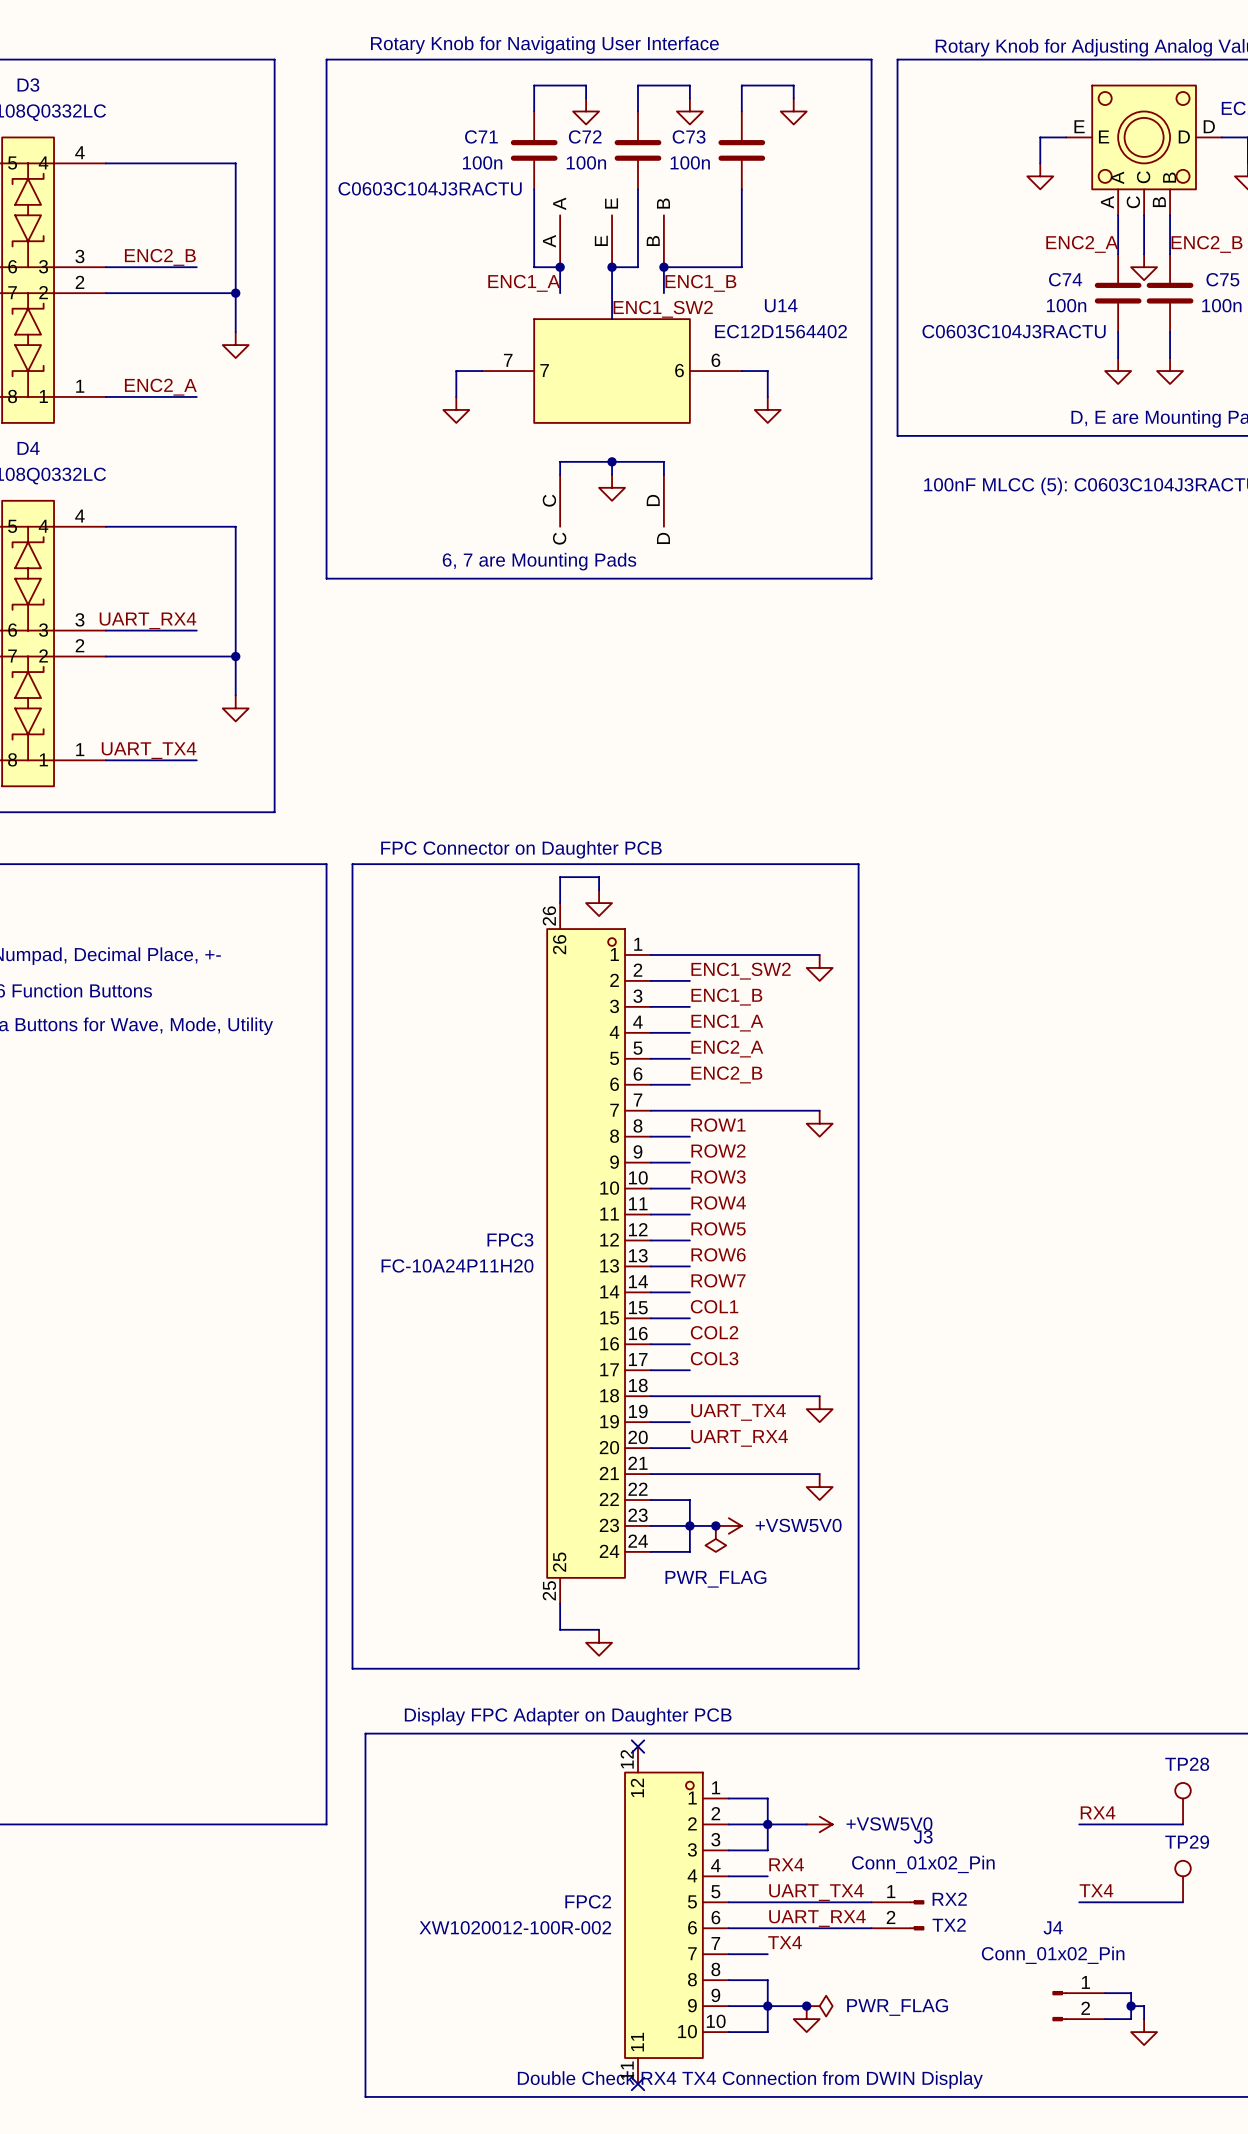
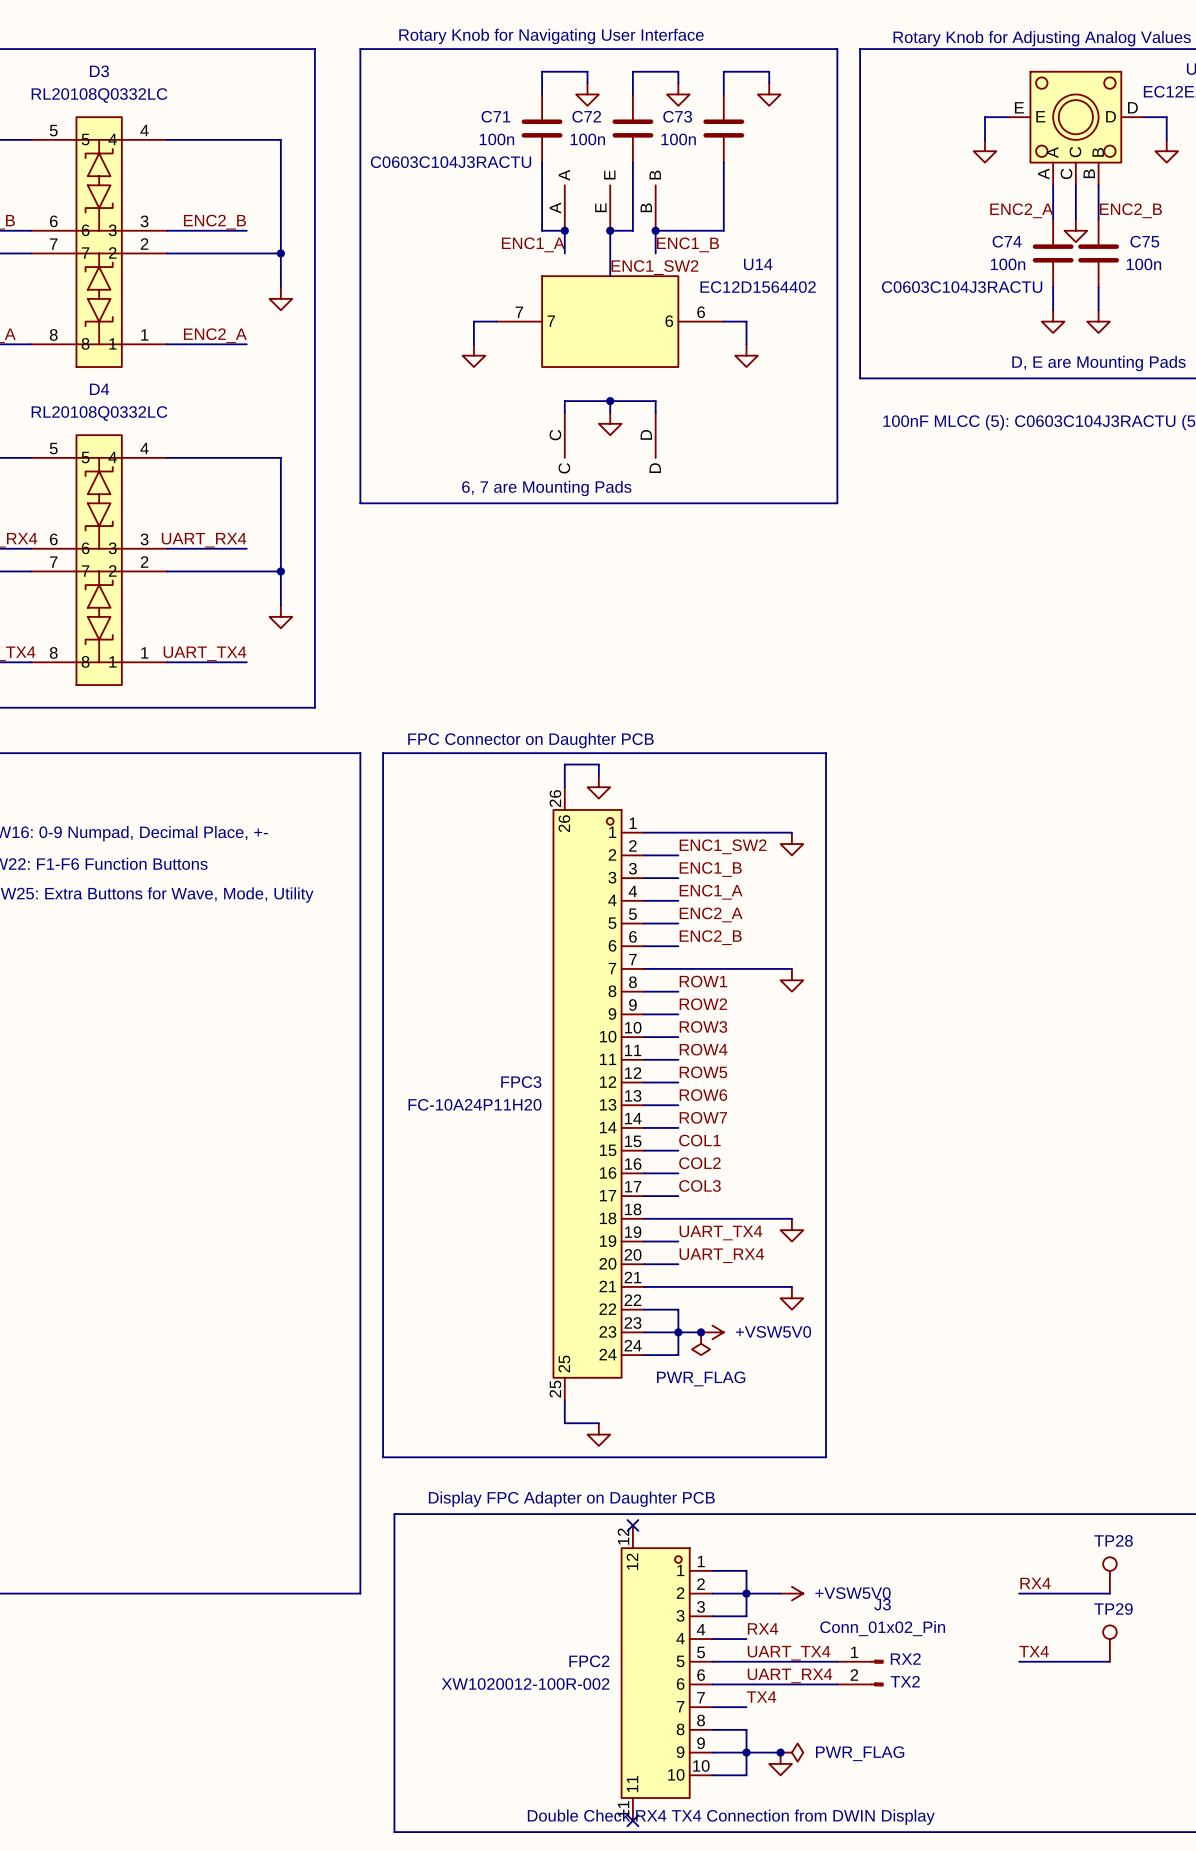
wire: (1105, 1993) (1131, 1993) (1131, 2019) (1105, 2019) -> none
J4: Conn_01x02_Pin (1078, 2006) -> none
wire: (1131, 2006) (1144, 2006) (1144, 2019) -> none
junction: (1131, 2006) -> none
power symbol: (1144, 2032) -> none

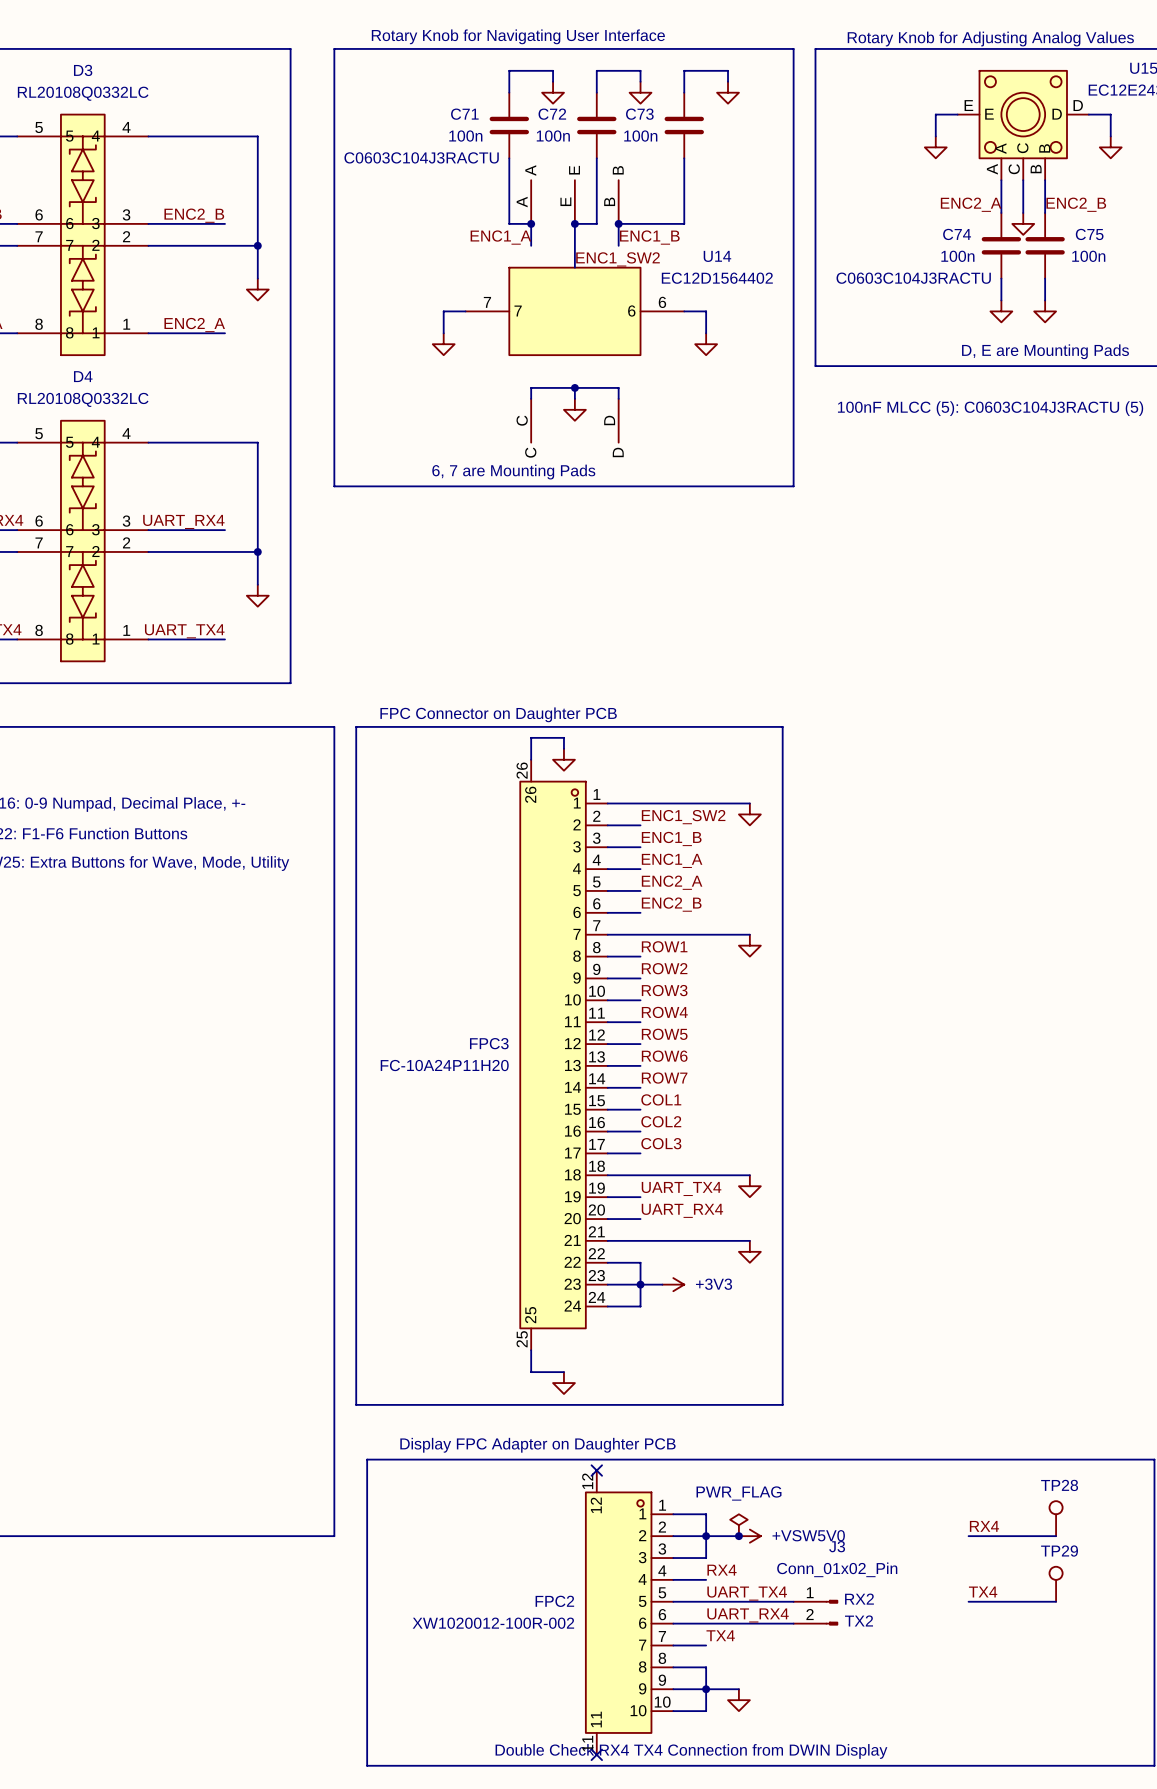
junction: (701, 1332) -> none
power symbol: +VSW5V0 (712, 1332) -> +3V3 (673, 1284)
power symbol: PWR_FLAG (701, 1343) -> none
power symbol: none -> PWR_FLAG (738, 1525)
junction: none -> (738, 1536)
junction: (780, 1752) -> none
power symbol: PWR_FLAG (791, 1752) -> none

